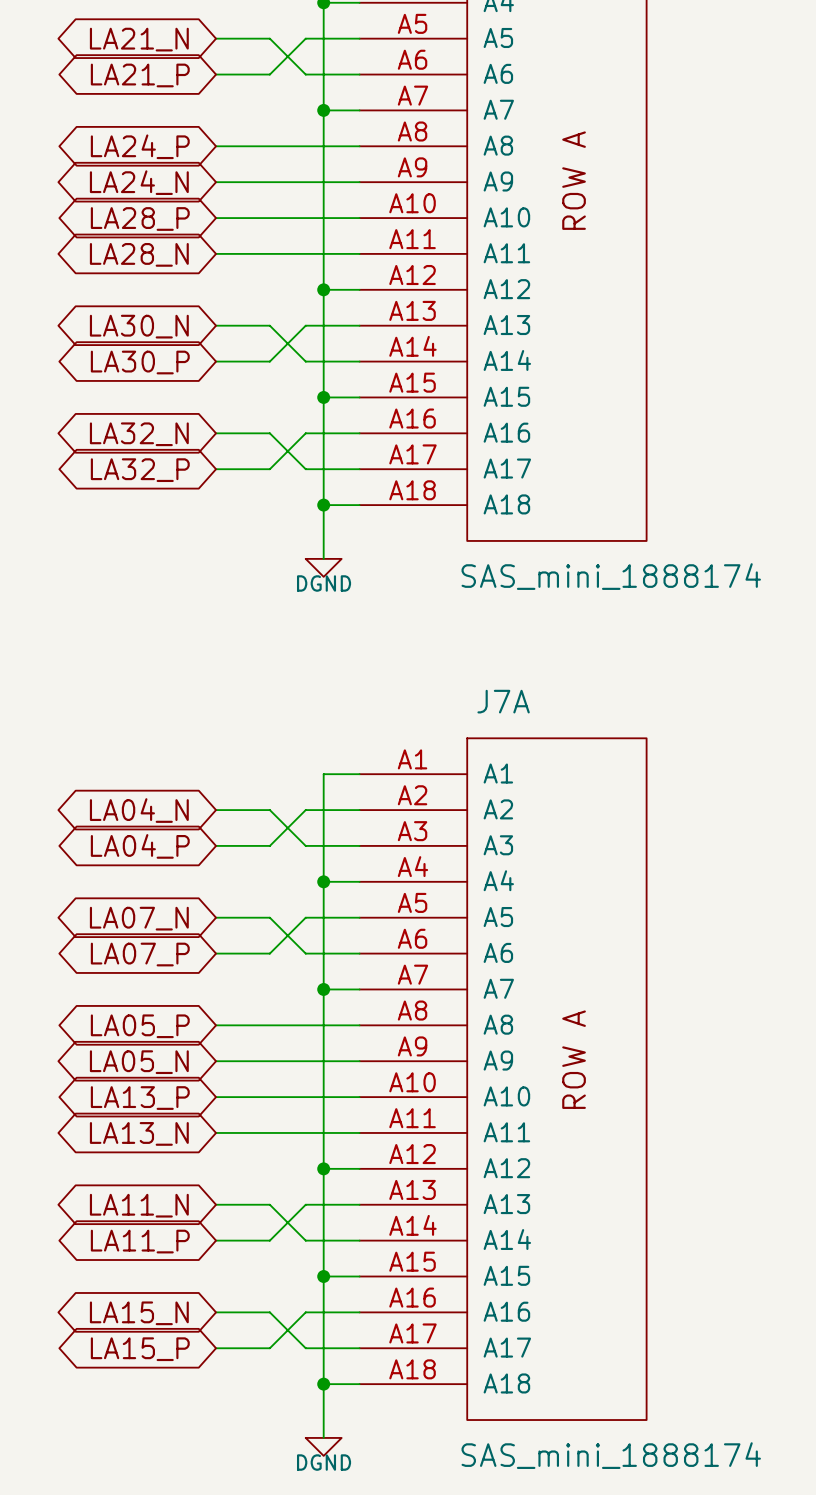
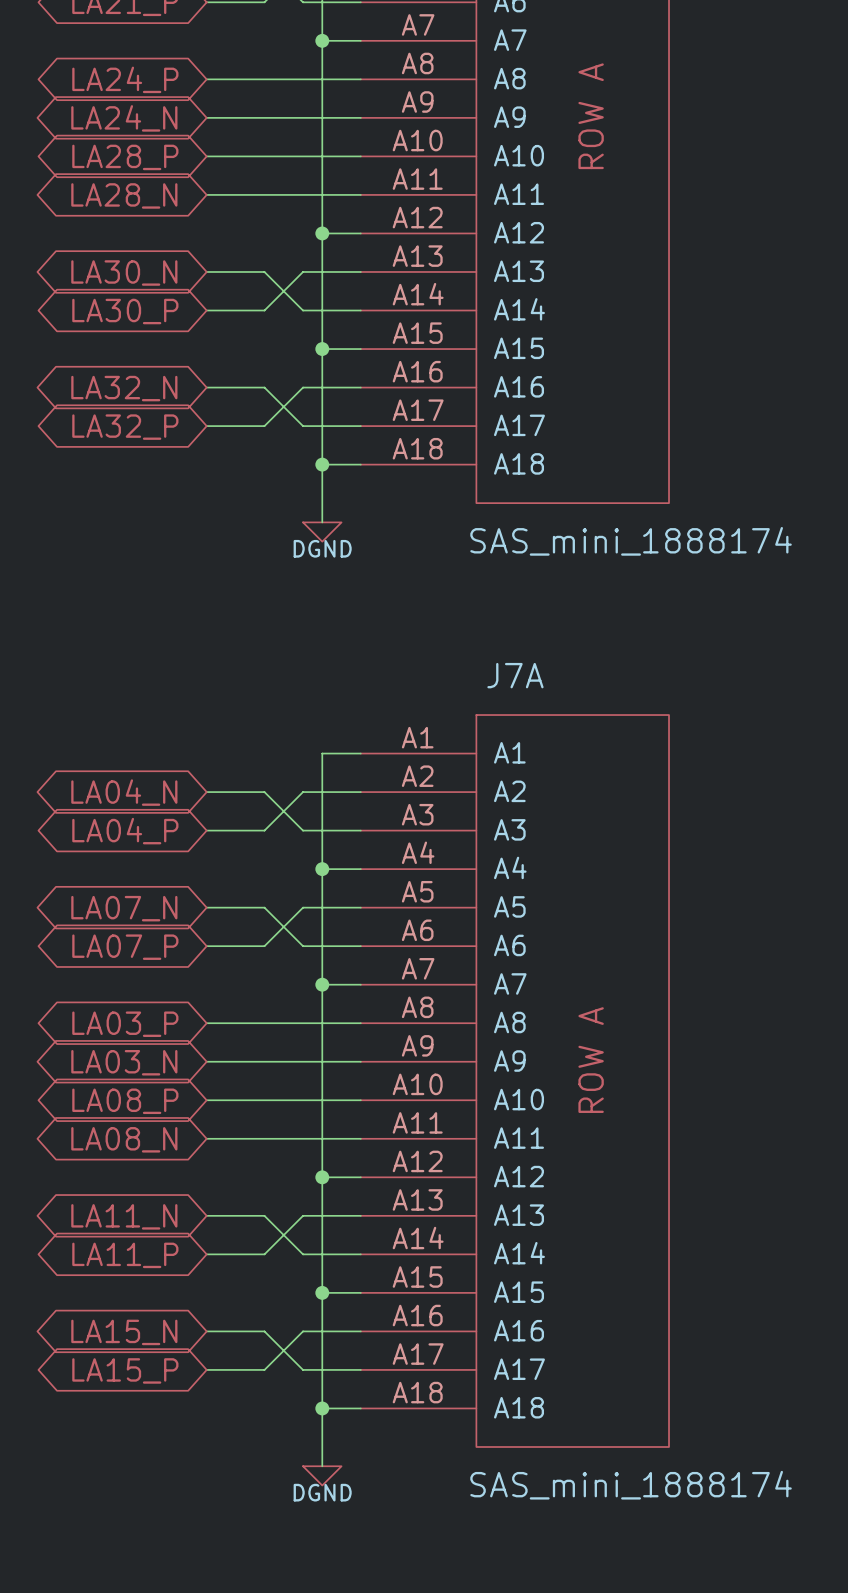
global label: LA05_P (140, 1026) -> LA03_P (125, 1024)
global label: LA05_N (139, 1062) -> LA03_N (124, 1062)
global label: LA13_P (140, 1098) -> LA08_P (125, 1101)
global label: LA13_N (139, 1133) -> LA08_N (124, 1139)

